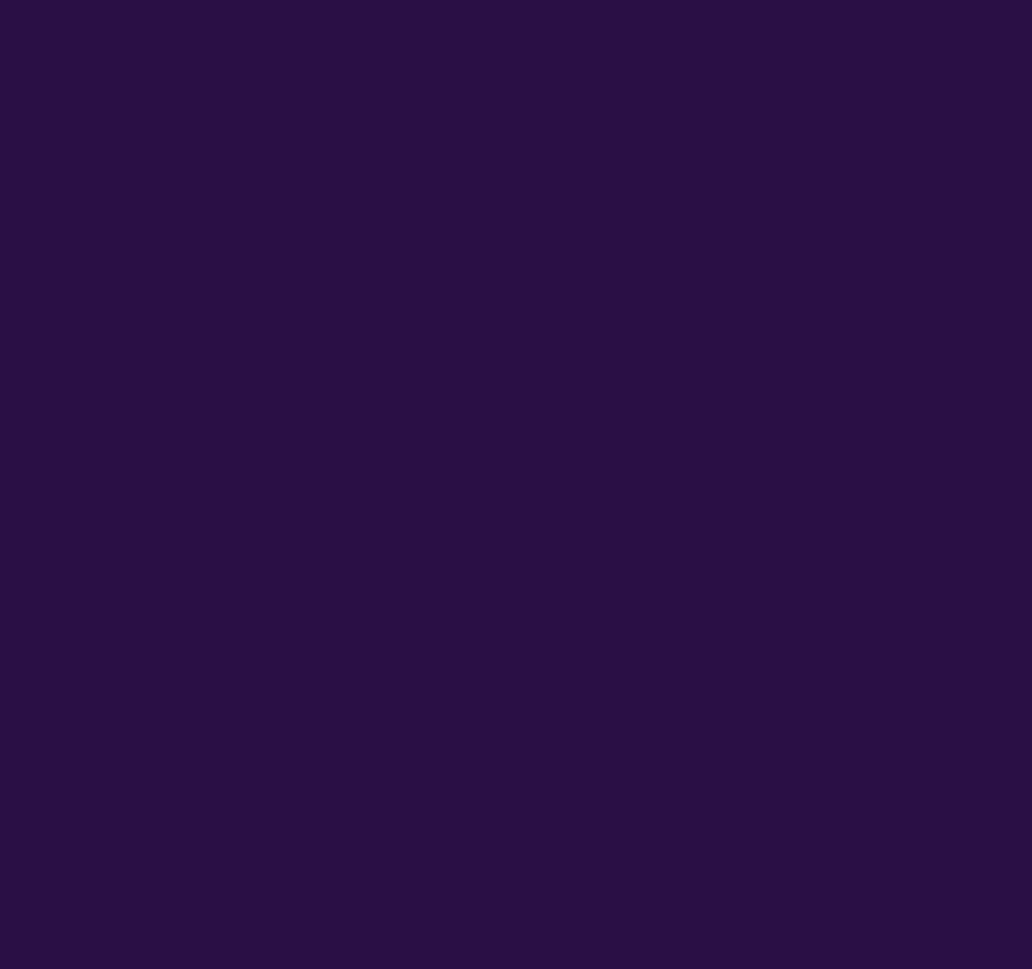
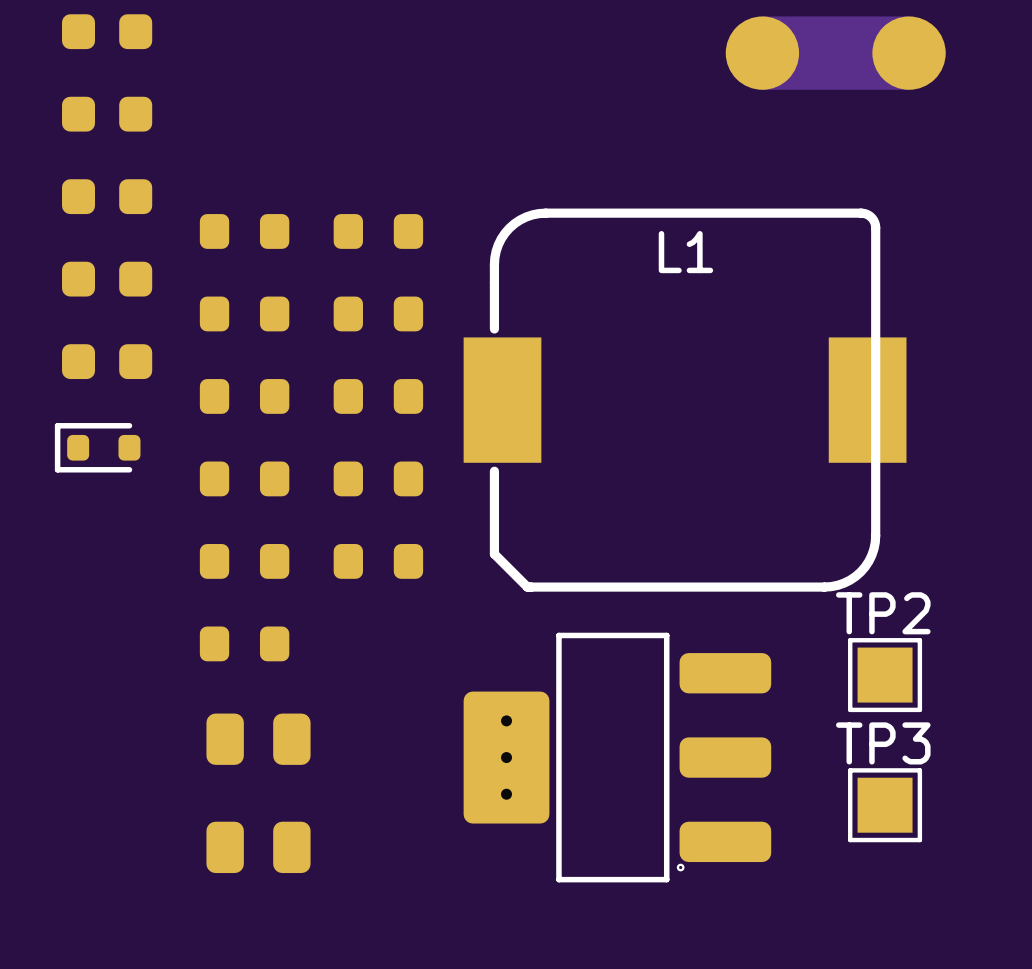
part: none -> (107, 31)
part: none -> (835, 53)
part: none -> (107, 114)
part: none -> (107, 196)
part: none -> (244, 231)
part: none -> (378, 231)
part: none -> (107, 279)
part: none -> (244, 313)
part: none -> (378, 313)
part: none -> (107, 361)
part: none -> (244, 396)
part: none -> (378, 396)
L1: none -> (685, 400)
part: none -> (97, 447)
part: none -> (244, 478)
part: none -> (378, 478)
part: none -> (244, 561)
part: none -> (378, 561)
part: none -> (244, 643)
TP2: none -> (885, 675)
part: none -> (258, 739)
part: none -> (617, 757)
TP3: none -> (885, 805)
part: none -> (258, 847)

